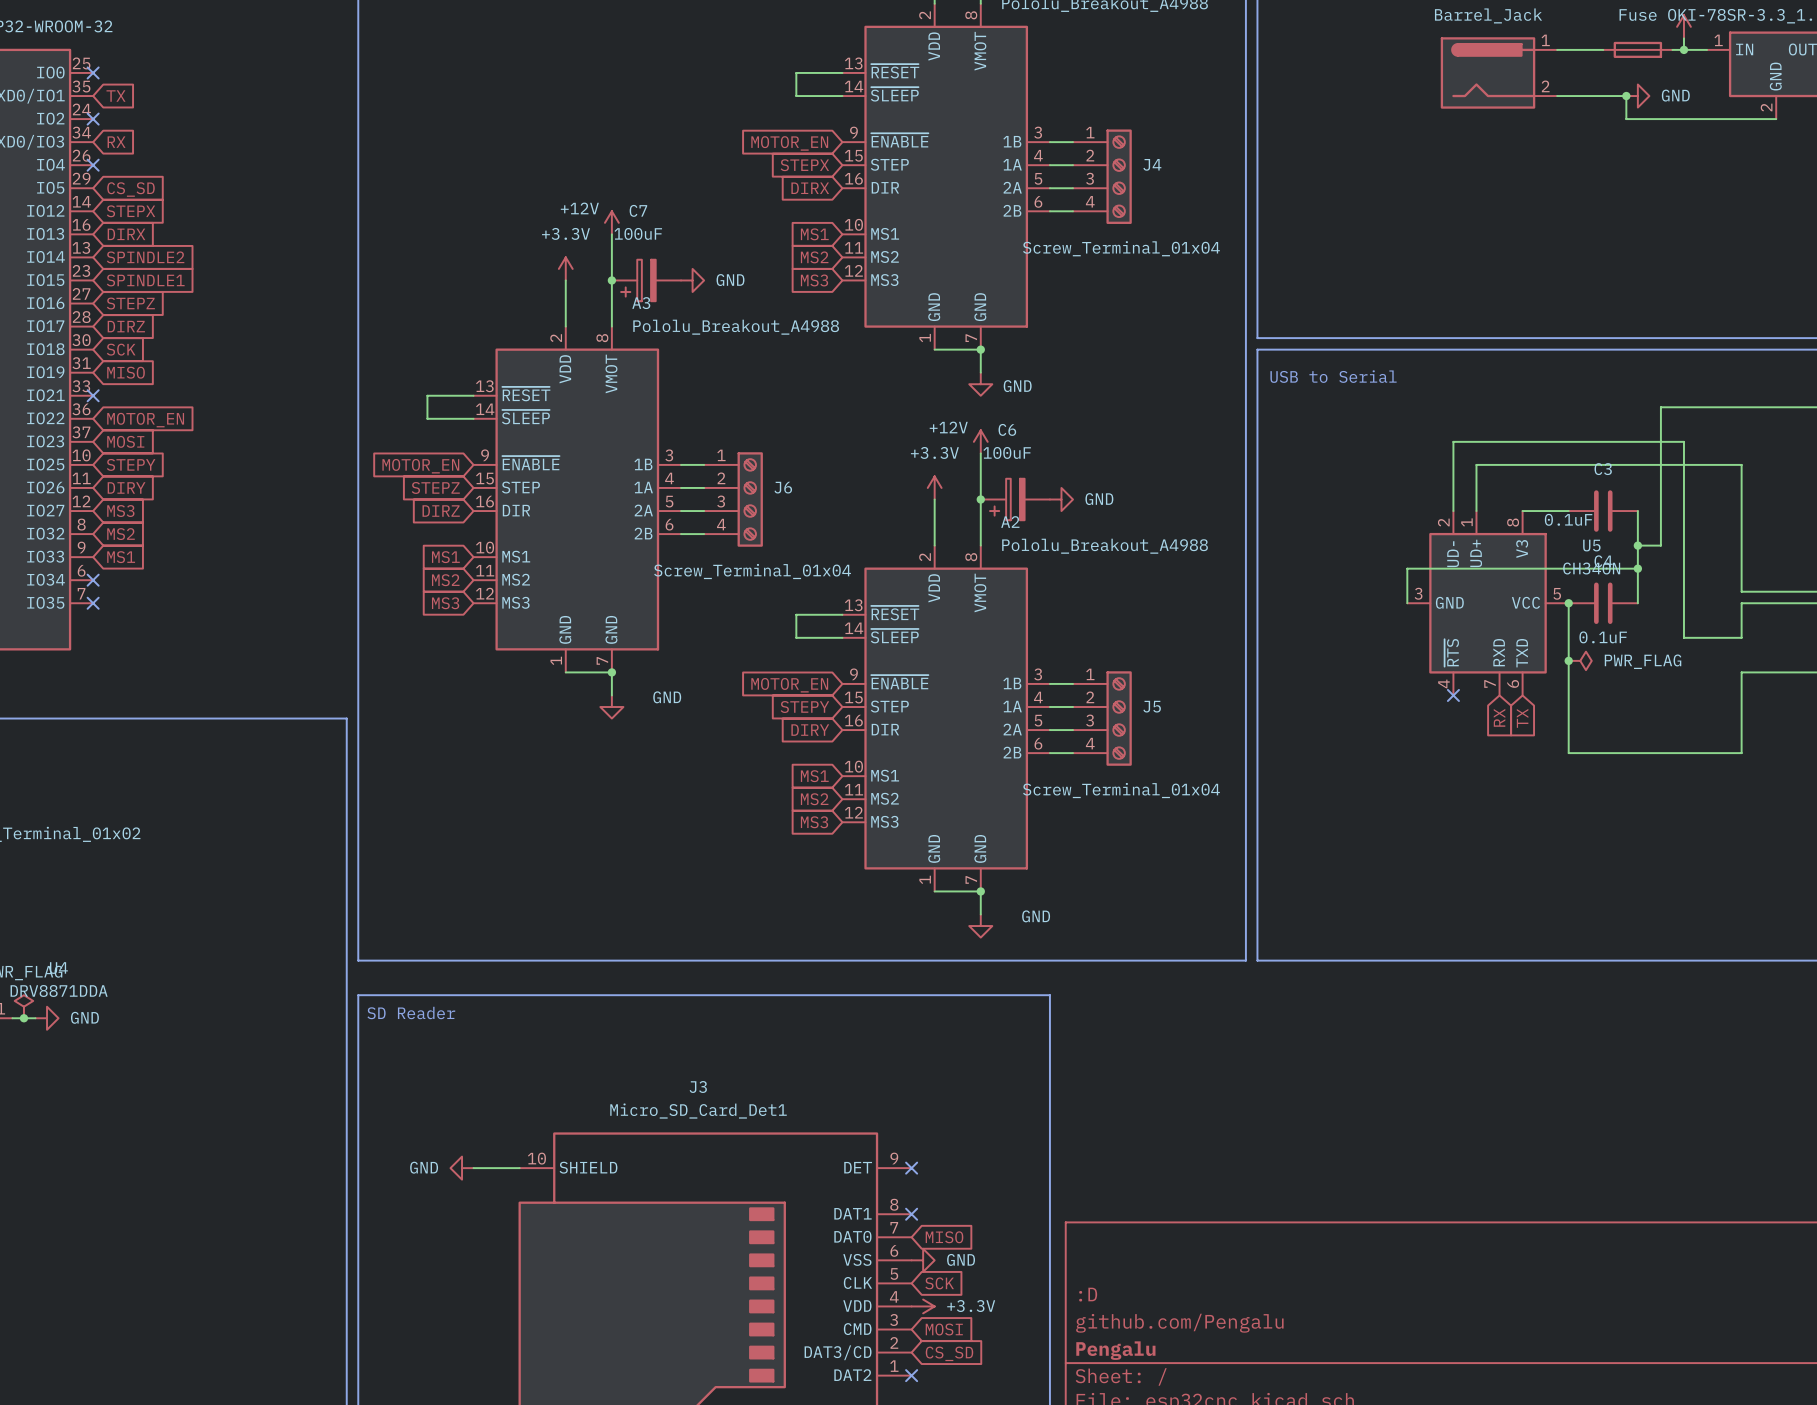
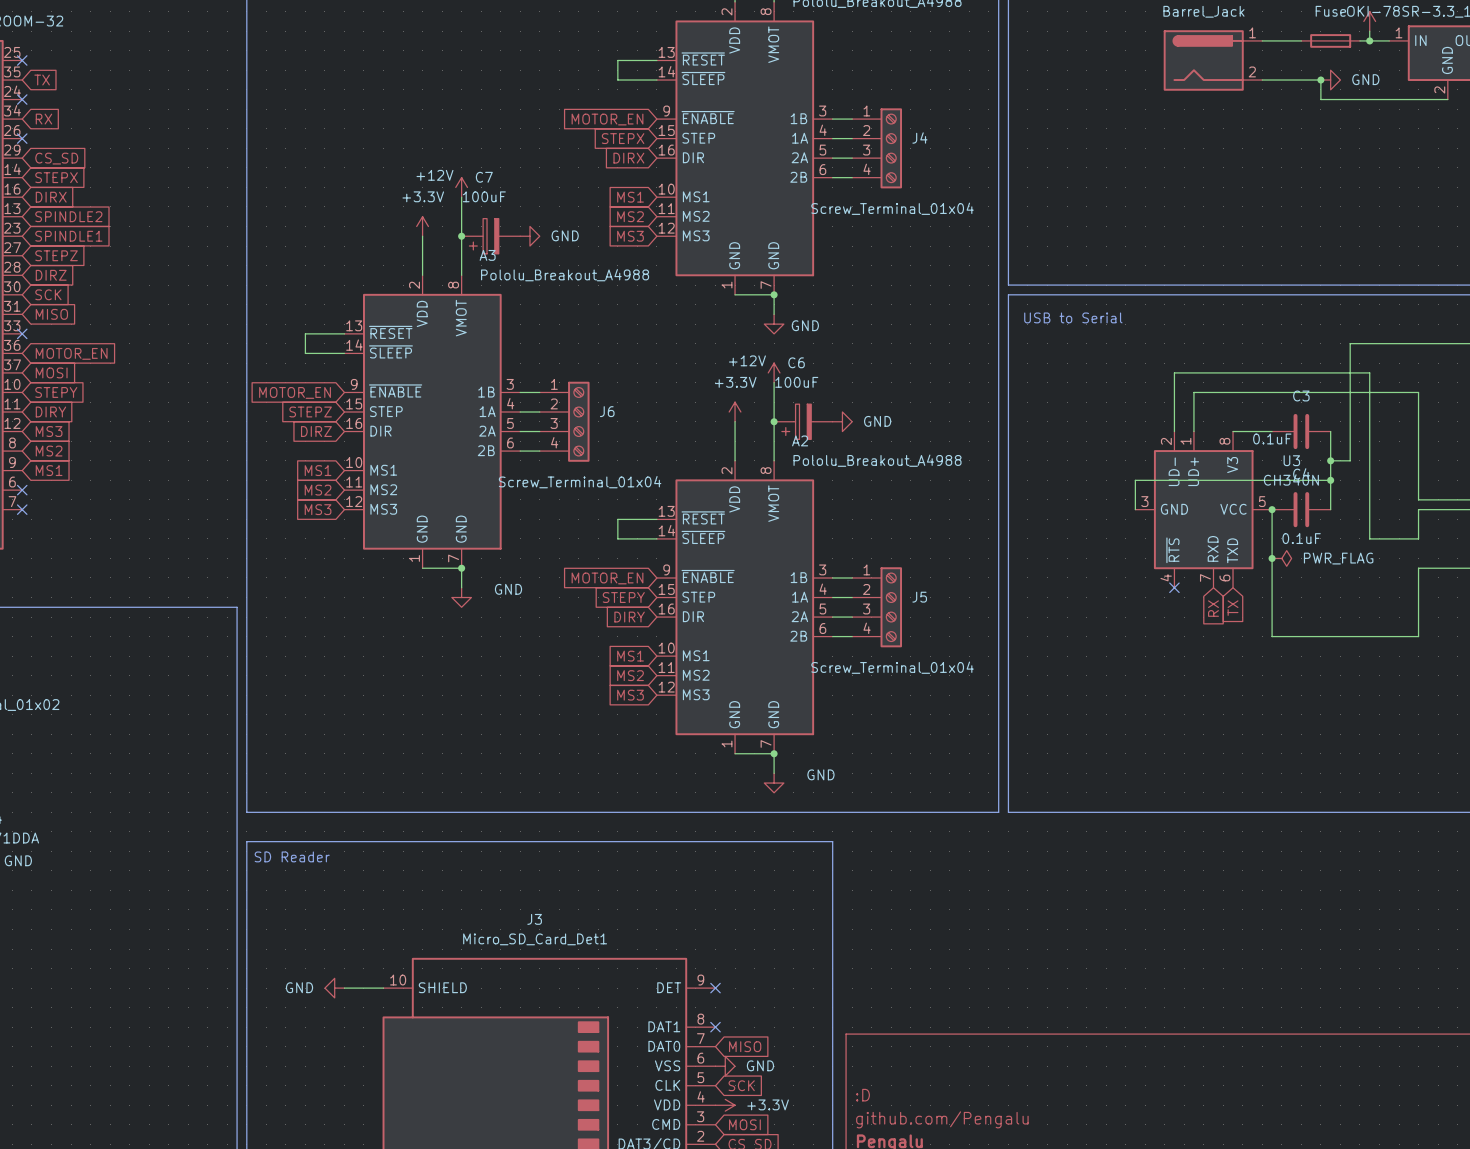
U5 name: U5 (1591, 545) -> U3 (1291, 460)

